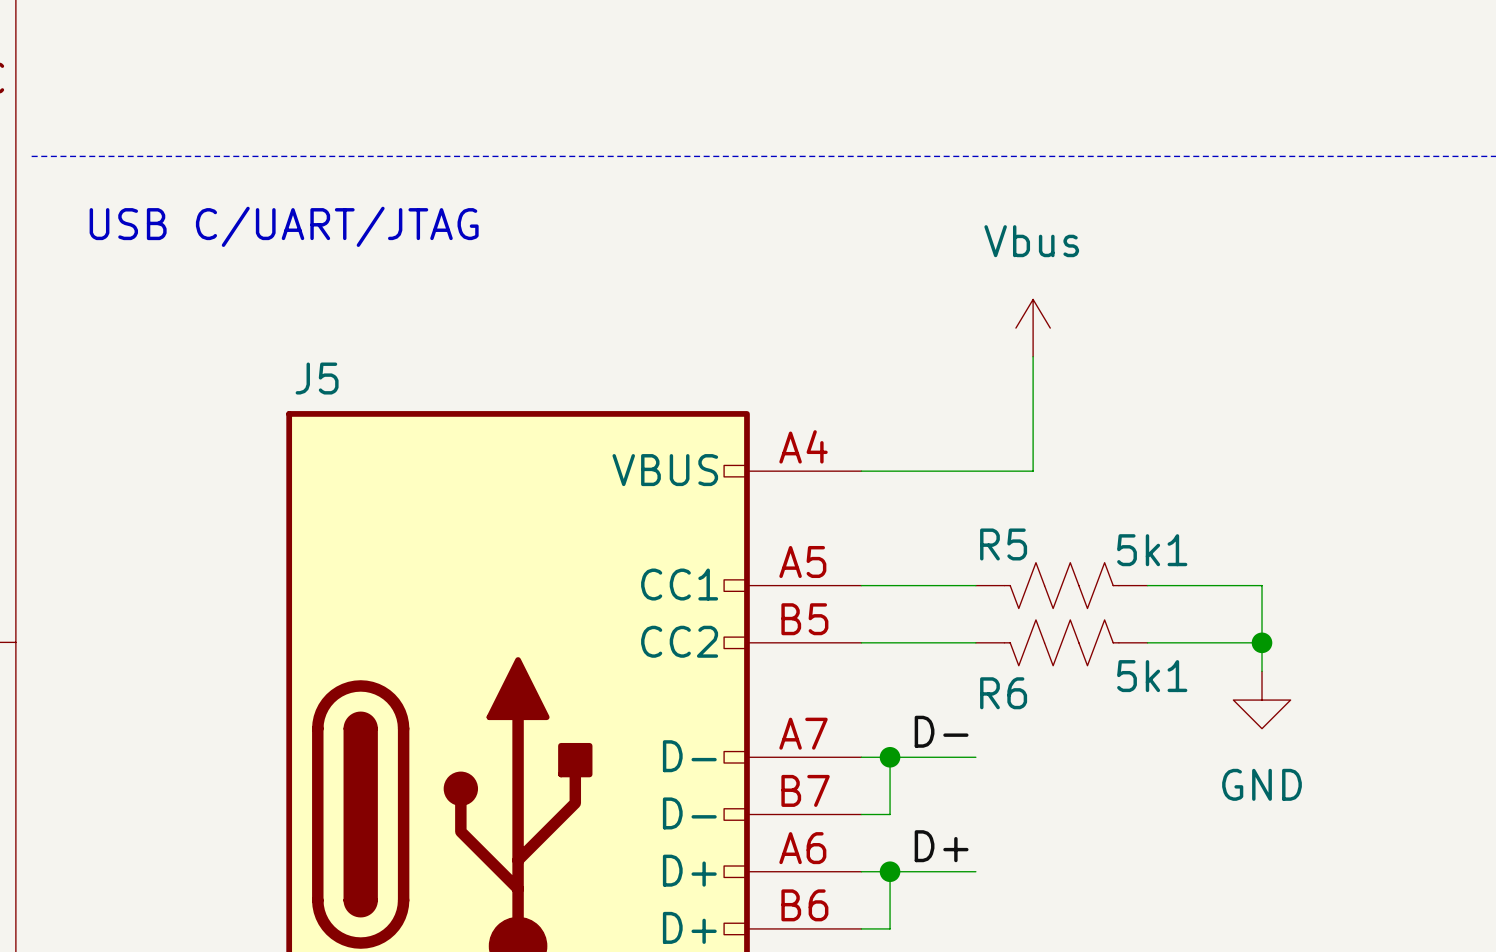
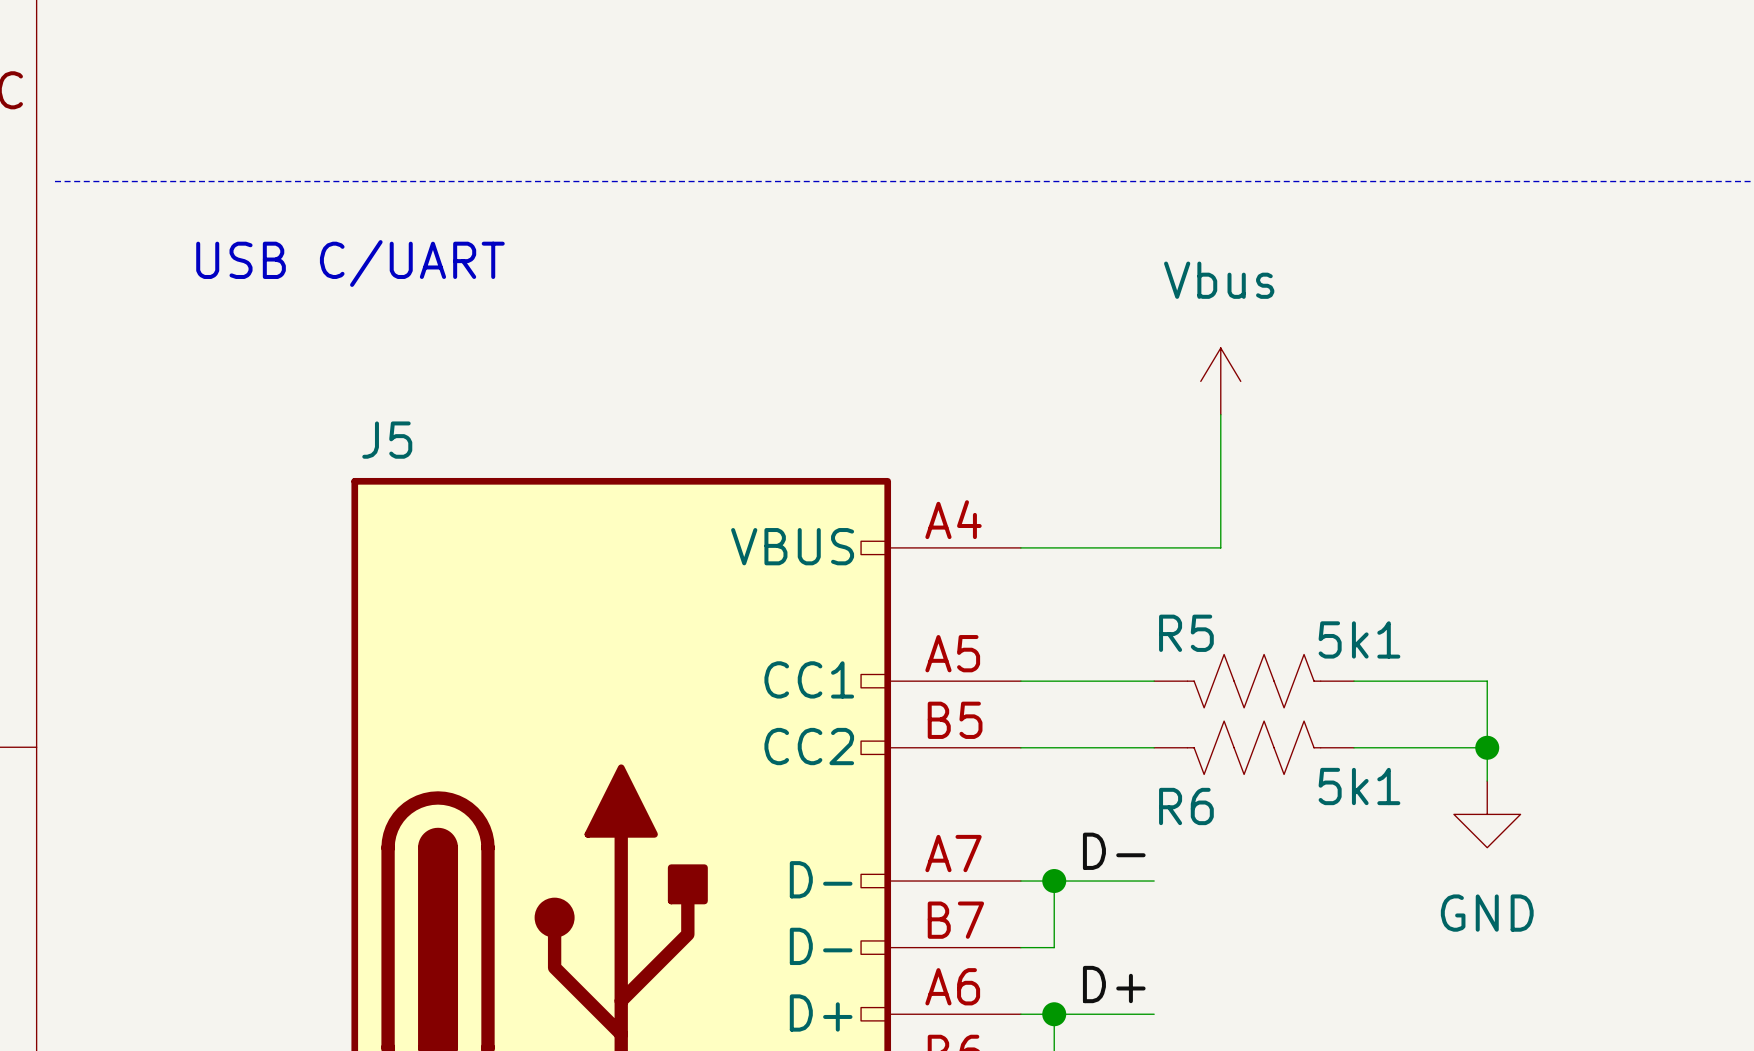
text: USB C/UART/JTAG (284, 226) -> USB C/UART (350, 263)

